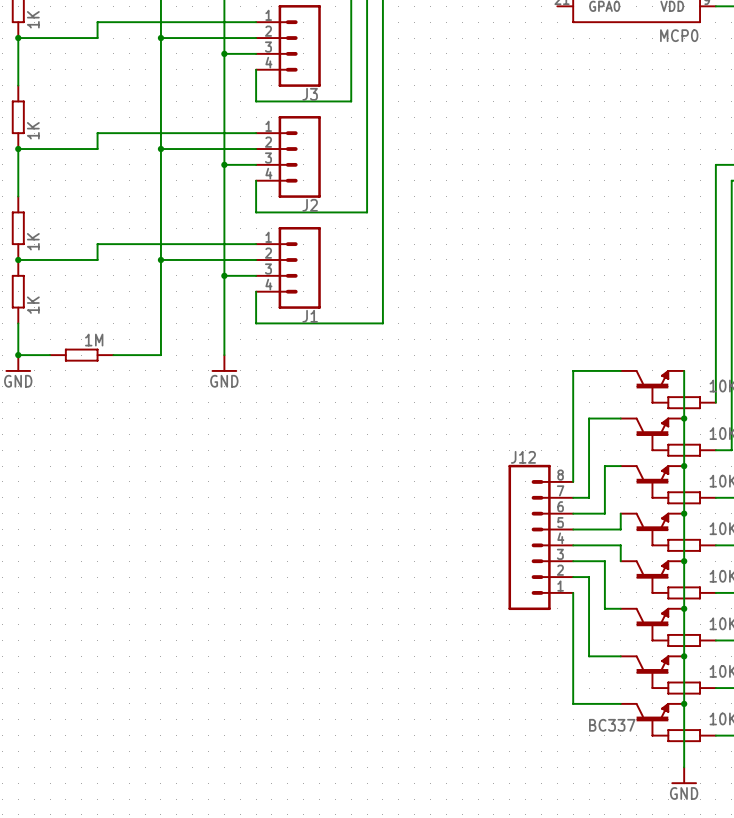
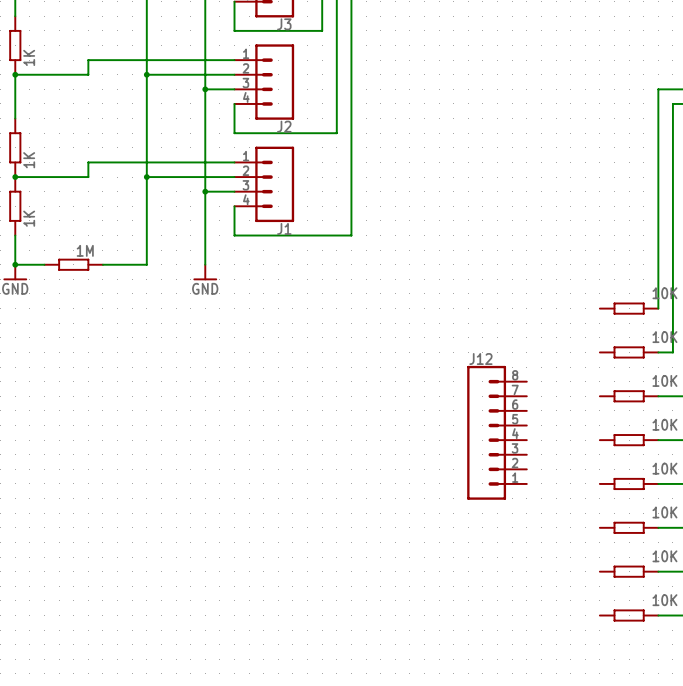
wire: (620, 370) (573, 370) (573, 481) -> none
wire: (684, 370) (684, 767) -> none
part: (652, 386) -> none
wire: (620, 418) (589, 418) (589, 497) (573, 497) -> none
junction: (684, 418) -> none
part: (652, 434) -> none
wire: (620, 466) (604, 466) (604, 513) (573, 513) -> none
junction: (684, 466) -> none
part: (652, 481) -> none
wire: (620, 513) (620, 529) (573, 529) -> none
junction: (684, 513) -> none
part: (652, 529) -> none
wire: (573, 545) (620, 545) (620, 561) -> none
wire: (573, 561) (604, 561) (604, 608) (620, 608) -> none
junction: (684, 561) -> none
part: (652, 576) -> none
wire: (573, 577) (589, 577) (589, 656) (620, 656) -> none
wire: (573, 592) (573, 703) (620, 703) -> none
junction: (684, 608) -> none
part: (652, 624) -> none
junction: (684, 656) -> none
part: (652, 671) -> none
junction: (684, 703) -> none
part: BC337 (652, 719) -> none
power symbol: GND (684, 775) -> none

